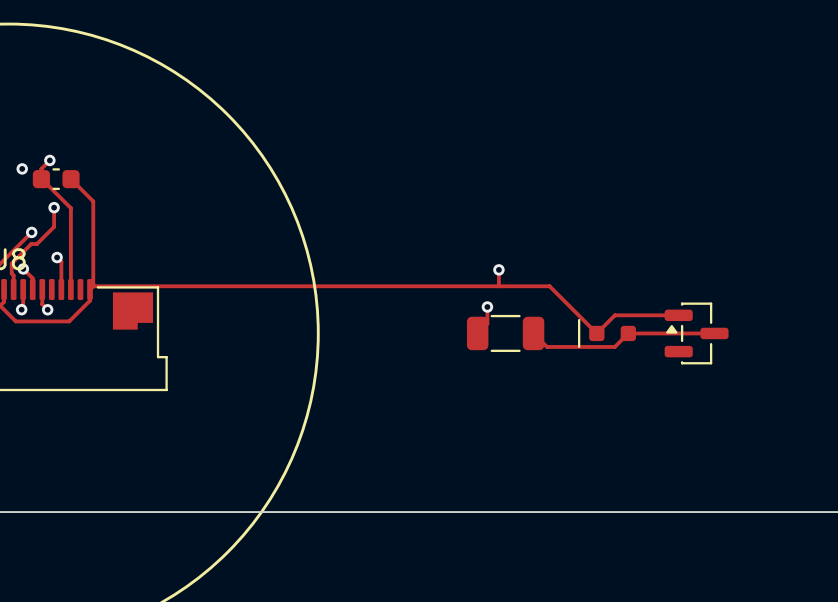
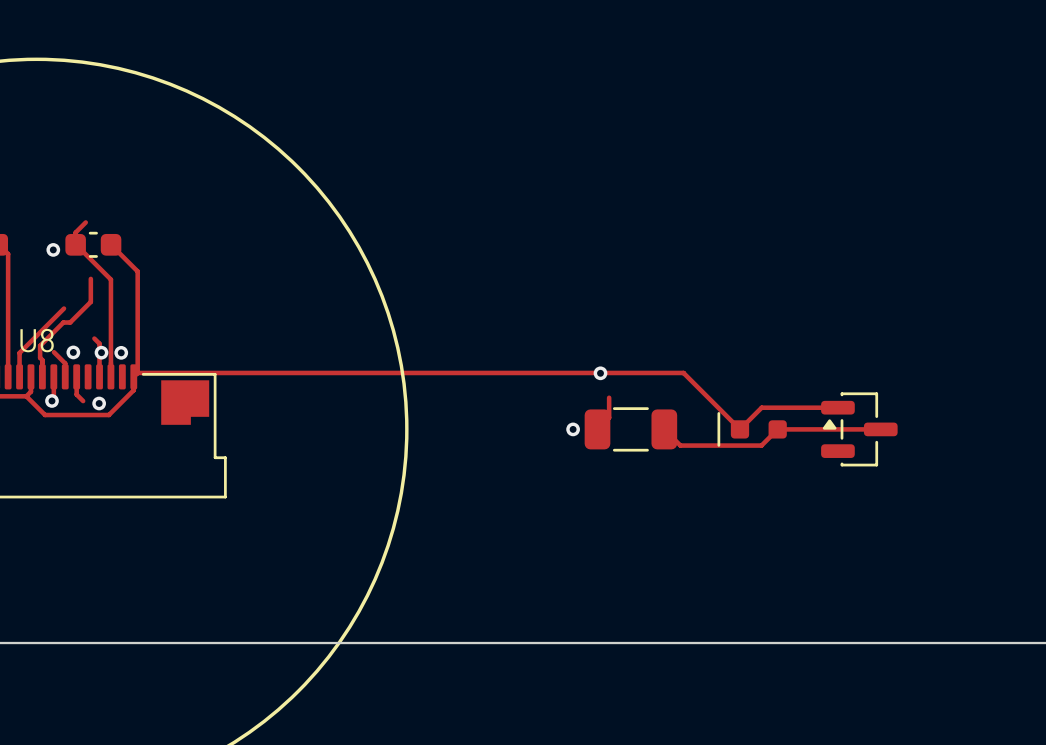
via: (49, 160) -> none
via position: (22, 168) -> (53, 249)
via: (54, 207) -> none
via: (31, 232) -> none
via: (57, 257) -> none
via: (23, 268) -> none
via: none -> (73, 352)
via: none -> (101, 352)
via: none -> (121, 352)
track: (498, 269) (498, 286) -> none
via: (498, 269) -> none
via: none -> (600, 373)
via: (487, 306) -> none
via position: (47, 309) -> (99, 403)
via: none -> (573, 429)

